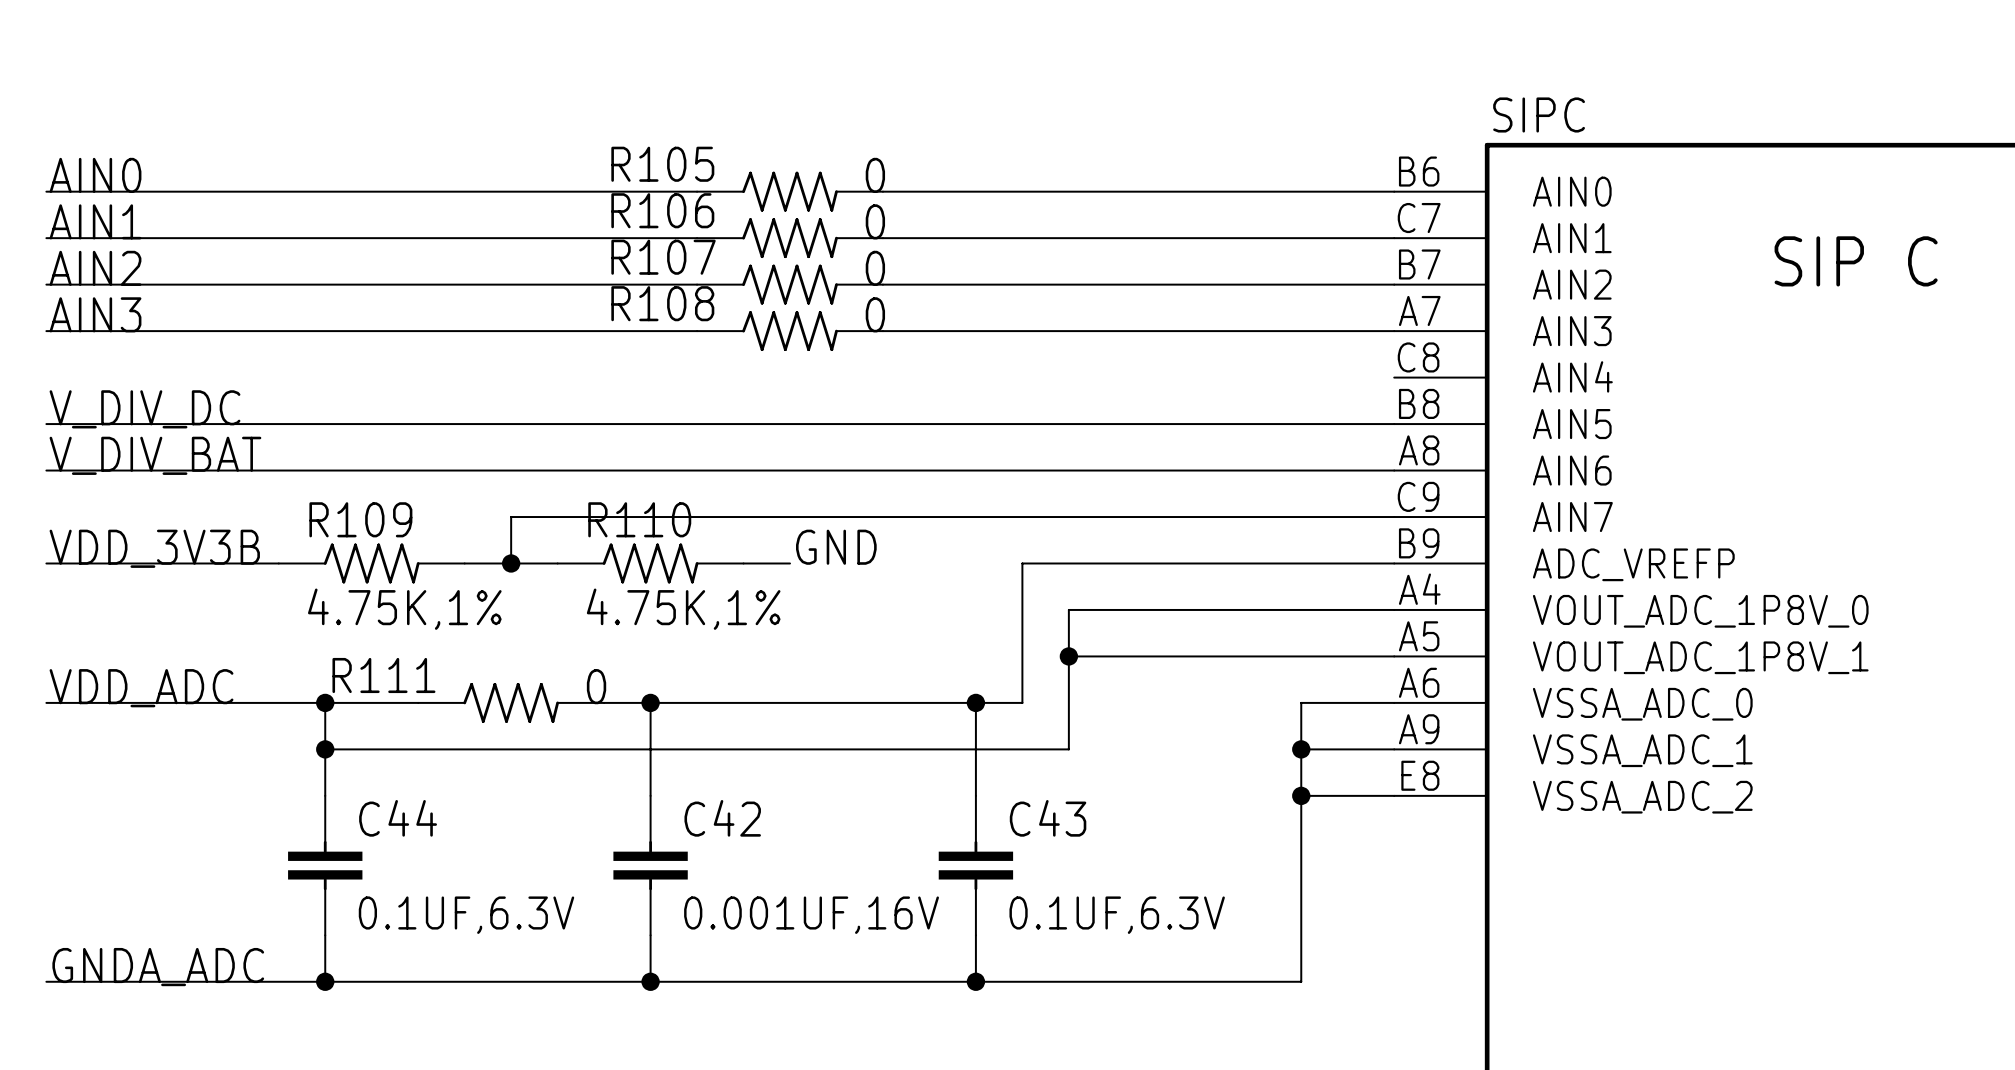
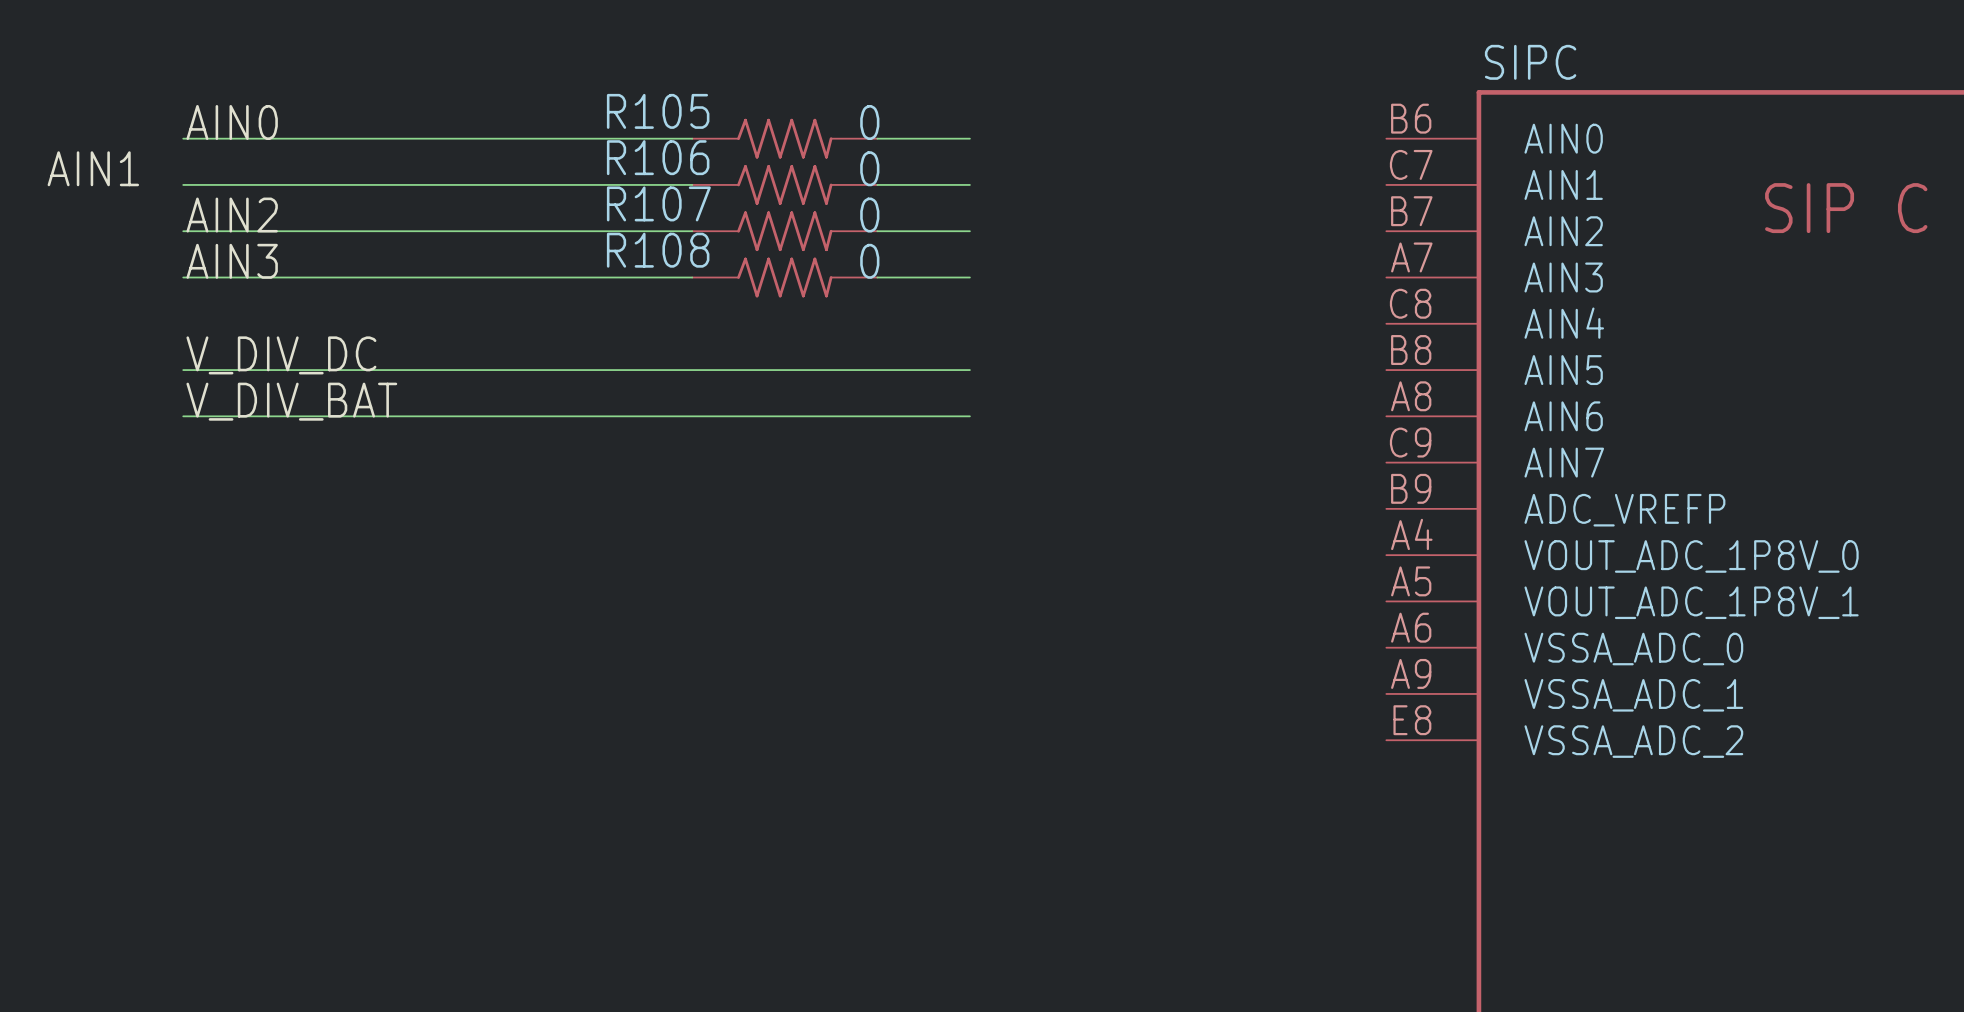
label position: AIN0 (95, 175) -> AIN0 (232, 122)
wire: (46, 191) (185, 191) -> none
wire: (975, 191) (1394, 191) -> none
wire: (46, 238) (185, 238) -> none
wire: (975, 238) (1394, 238) -> none
label position: AIN2 (95, 268) -> AIN2 (232, 215)
wire: (46, 284) (185, 284) -> none
wire: (975, 284) (1394, 284) -> none
label position: AIN3 (95, 314) -> AIN3 (232, 261)
wire: (46, 331) (185, 331) -> none
wire: (975, 331) (1394, 331) -> none
label position: V_DIV_DC (145, 409) -> V_DIV_DC (281, 355)
wire: (46, 424) (185, 424) -> none
wire: (975, 424) (1394, 424) -> none
label position: V_DIV_BAT (155, 455) -> V_DIV_BAT (291, 401)
wire: (46, 470) (185, 470) -> none
wire: (975, 470) (1394, 470) -> none
wire: (1394, 517) (511, 517) (511, 563) -> none
label: GND (836, 547) -> none
label: VDD_3V3B (154, 548) -> none
wire: (46, 563) (278, 563) -> none
R109: 4.75K,1% (371, 563) -> none
wire: (464, 563) (557, 563) -> none
junction: (511, 563) -> none
R110: 4.75K,1% (650, 563) -> none
wire: (743, 563) (790, 563) -> none
wire: (1394, 563) (1022, 563) (1022, 702) (604, 702) -> none
wire: (1394, 609) (1068, 609) (1068, 749) (325, 749) -> none
wire: (1068, 656) (1394, 656) -> none
junction: (1068, 656) -> none
label: VDD_ADC (141, 688) -> none
wire: (46, 702) (418, 702) -> none
wire: (325, 702) (325, 795) -> none
junction: (325, 702) -> none
R111: 0 (511, 702) -> none
wire: (650, 702) (650, 795) -> none
junction: (650, 702) -> none
wire: (975, 702) (975, 795) -> none
junction: (975, 702) -> none
wire: (1394, 702) (1301, 702) (1301, 981) (46, 981) -> none
junction: (325, 749) -> none
wire: (1301, 749) (1394, 749) -> none
junction: (1301, 749) -> none
wire: (1301, 795) (1394, 795) -> none
junction: (1301, 795) -> none
C44: 0.1UF,6.3V (325, 865) -> none
C42: 0.001UF,16V (650, 865) -> none
C43: 0.1UF,6.3V (975, 865) -> none
wire: (325, 935) (325, 981) -> none
wire: (650, 935) (650, 981) -> none
wire: (975, 935) (975, 981) -> none
label: GNDA_ADC (158, 967) -> none
junction: (325, 981) -> none
junction: (650, 981) -> none
junction: (975, 981) -> none

